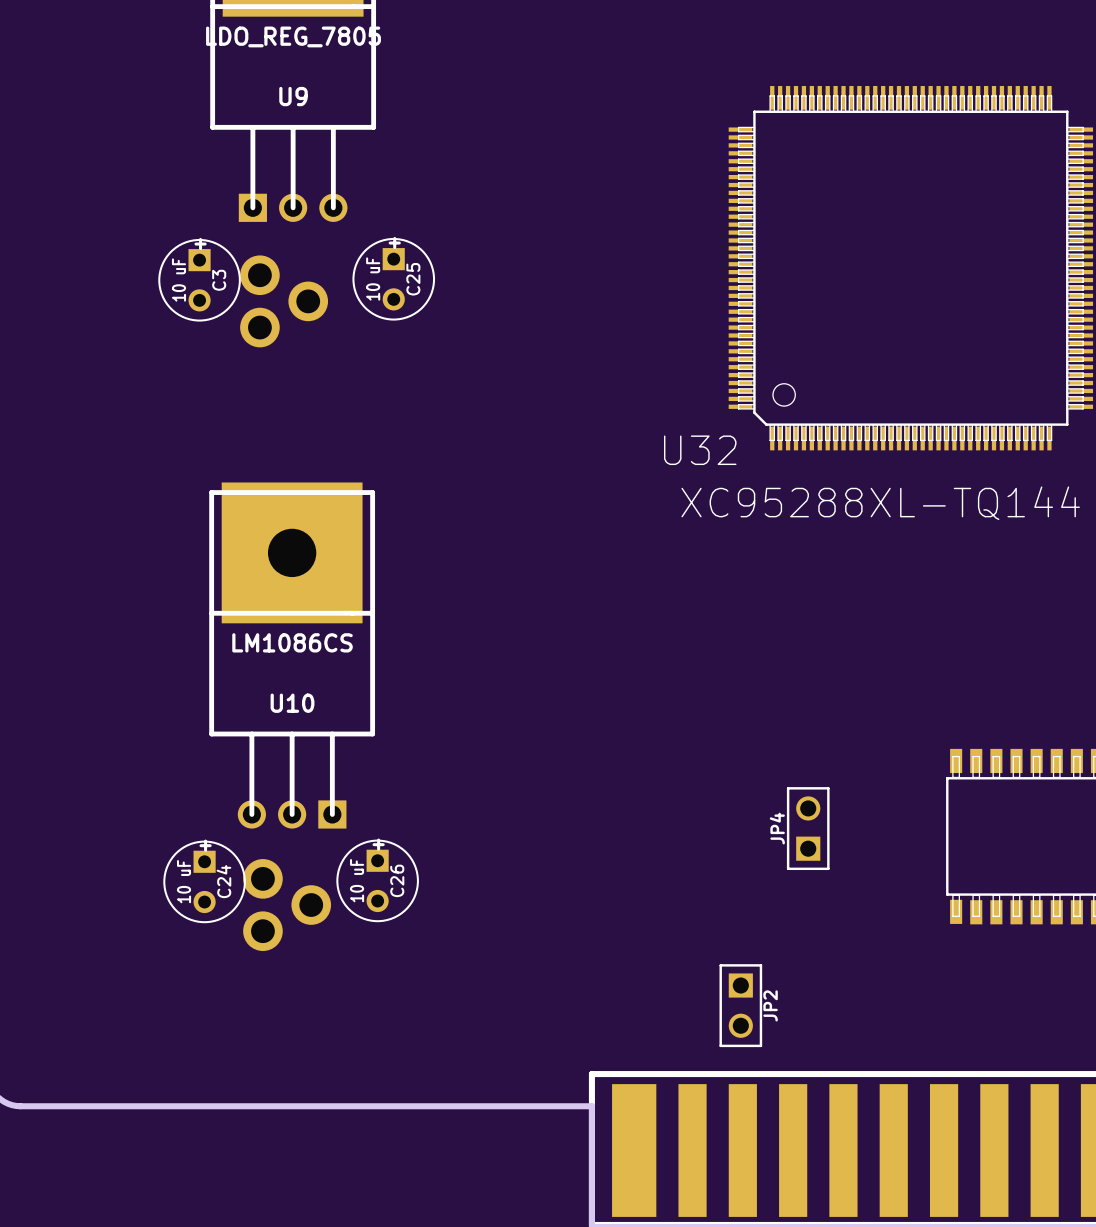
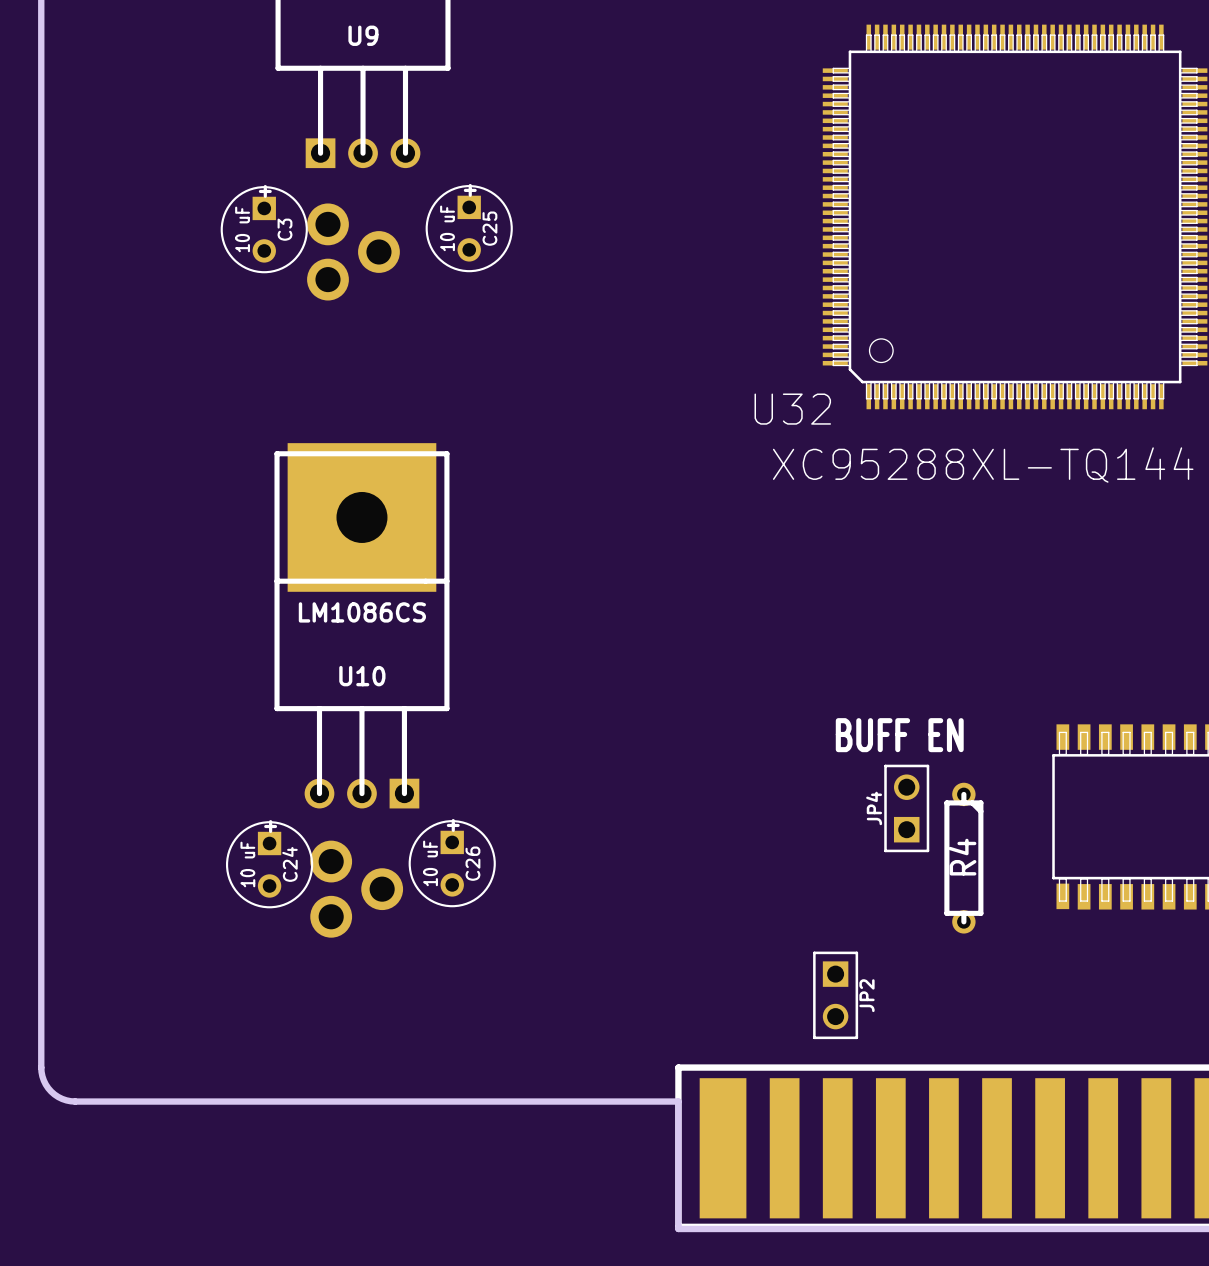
text: none -> BUFF EN (899, 735)
R4: none -> (963, 858)

